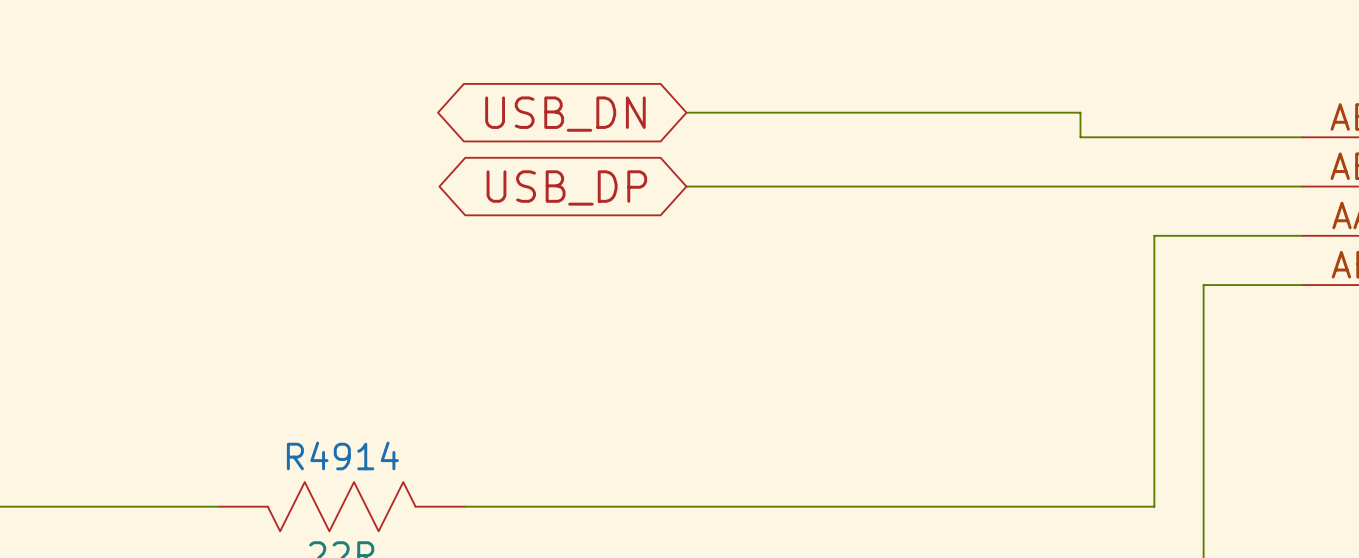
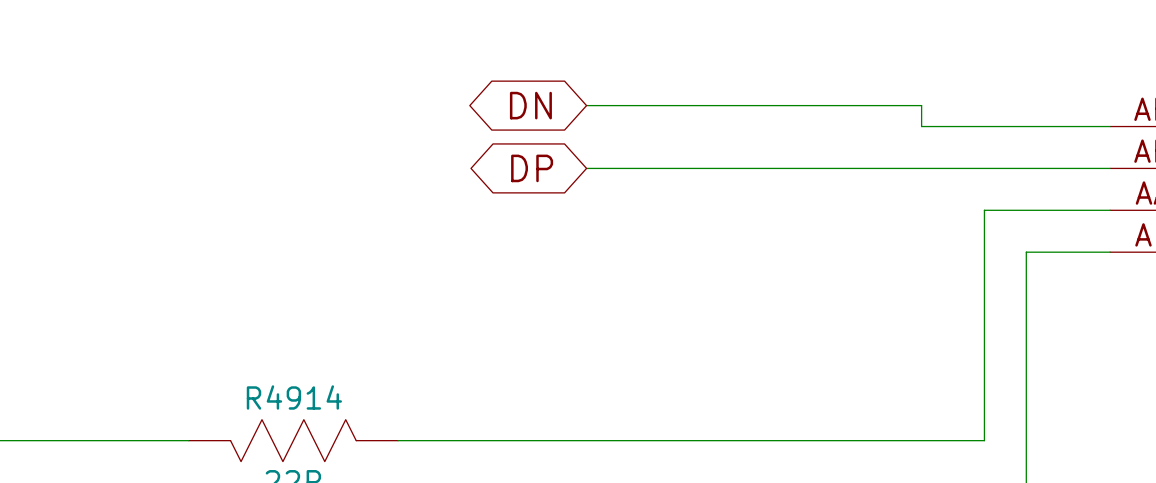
global label: USB_DN (565, 114) -> DN (530, 105)
global label: USB_DP (566, 187) -> DP (532, 168)

